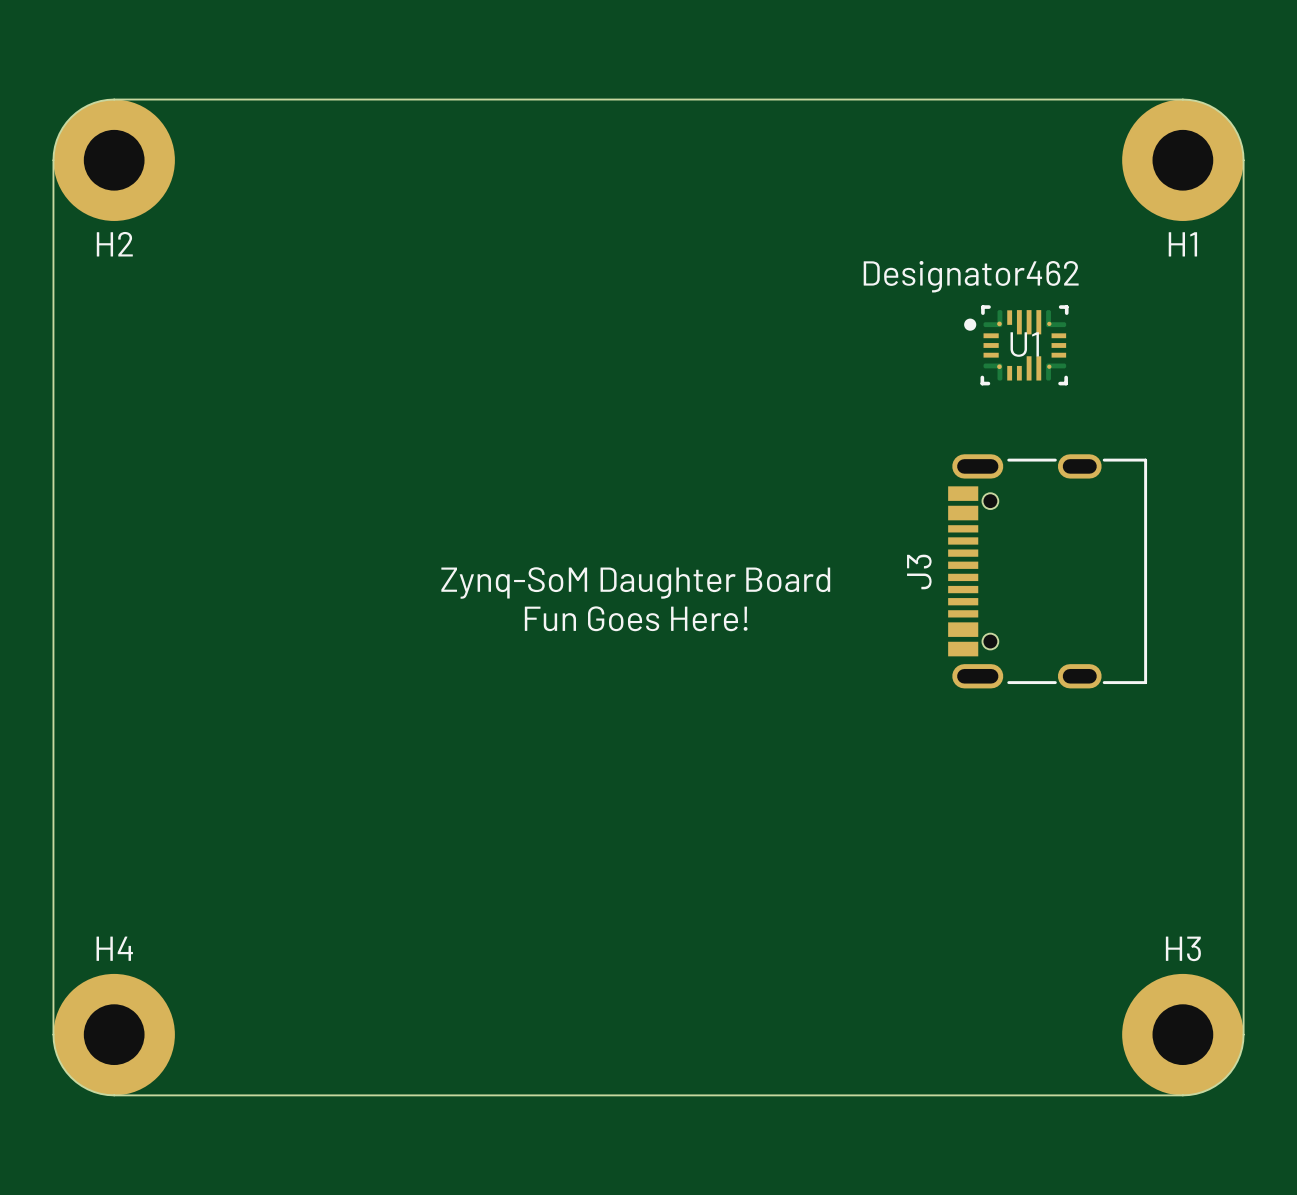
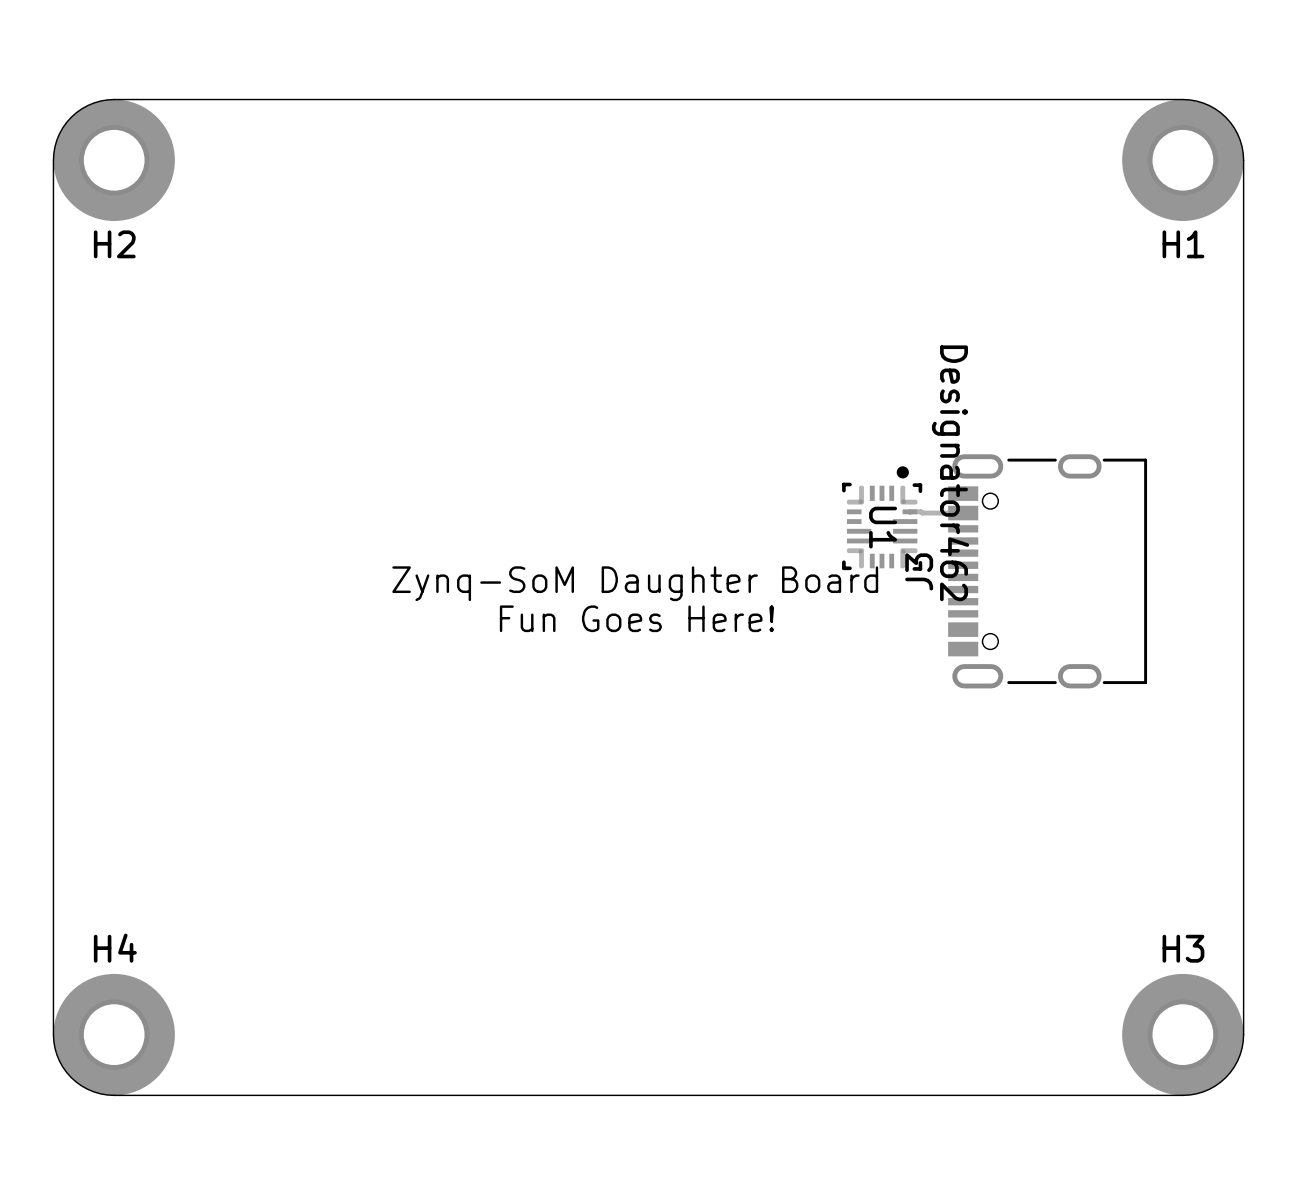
U1 rotation: 0° (1016, 345) -> 90° clockwise (882, 518)
U1 position: (1016, 345) -> (882, 518)
track: none -> (909, 511) (963, 513)

